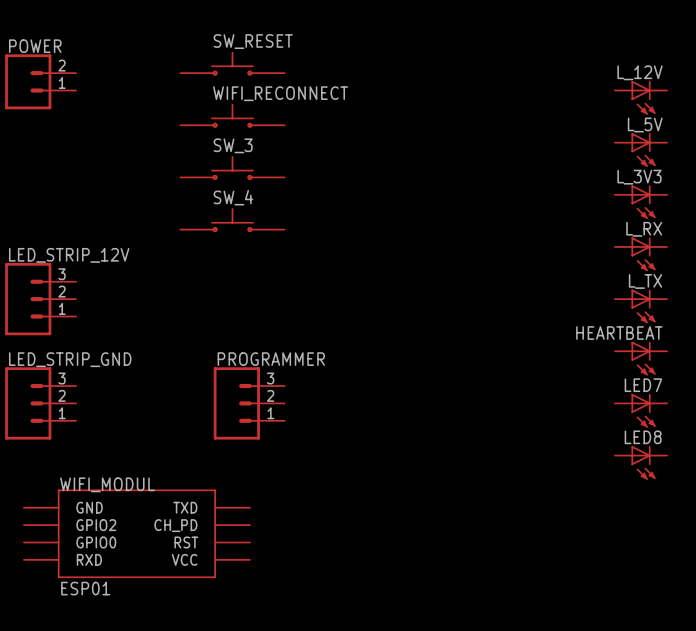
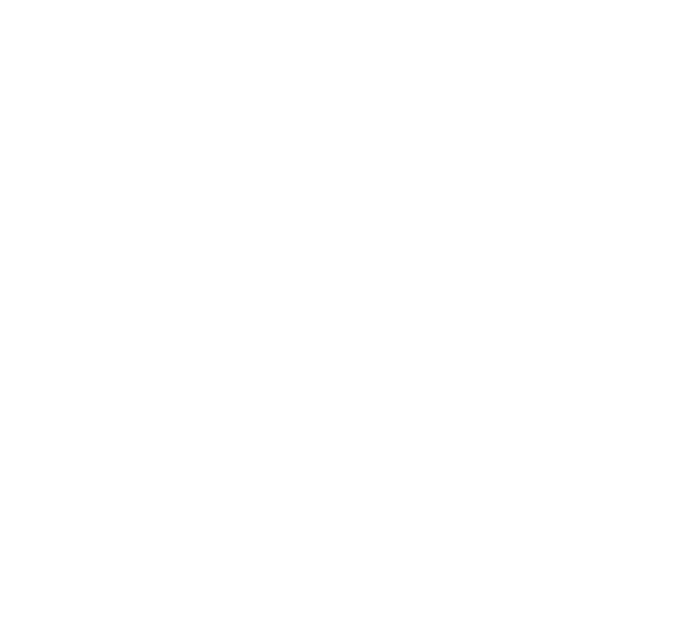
SW_RESET: (232, 63) -> none
POWER: (40, 81) -> none
L_12V: (641, 97) -> none
WIFI_RECONNECT: (232, 115) -> none
L_5V: (641, 149) -> none
SW_3: (232, 168) -> none
L_3V3: (641, 202) -> none
SW_4: (232, 220) -> none
L_RX: (641, 254) -> none
LED_STRIP_12V: (40, 299) -> none
L_TX: (641, 306) -> none
HEARTBEAT: (641, 358) -> none
LED_STRIP_GND: (40, 403) -> none
PROGRAMMER: (249, 403) -> none
LED7: (641, 410) -> none
LED8: (641, 462) -> none
WIFI_MODUL: ESP01 (136, 533) -> none

